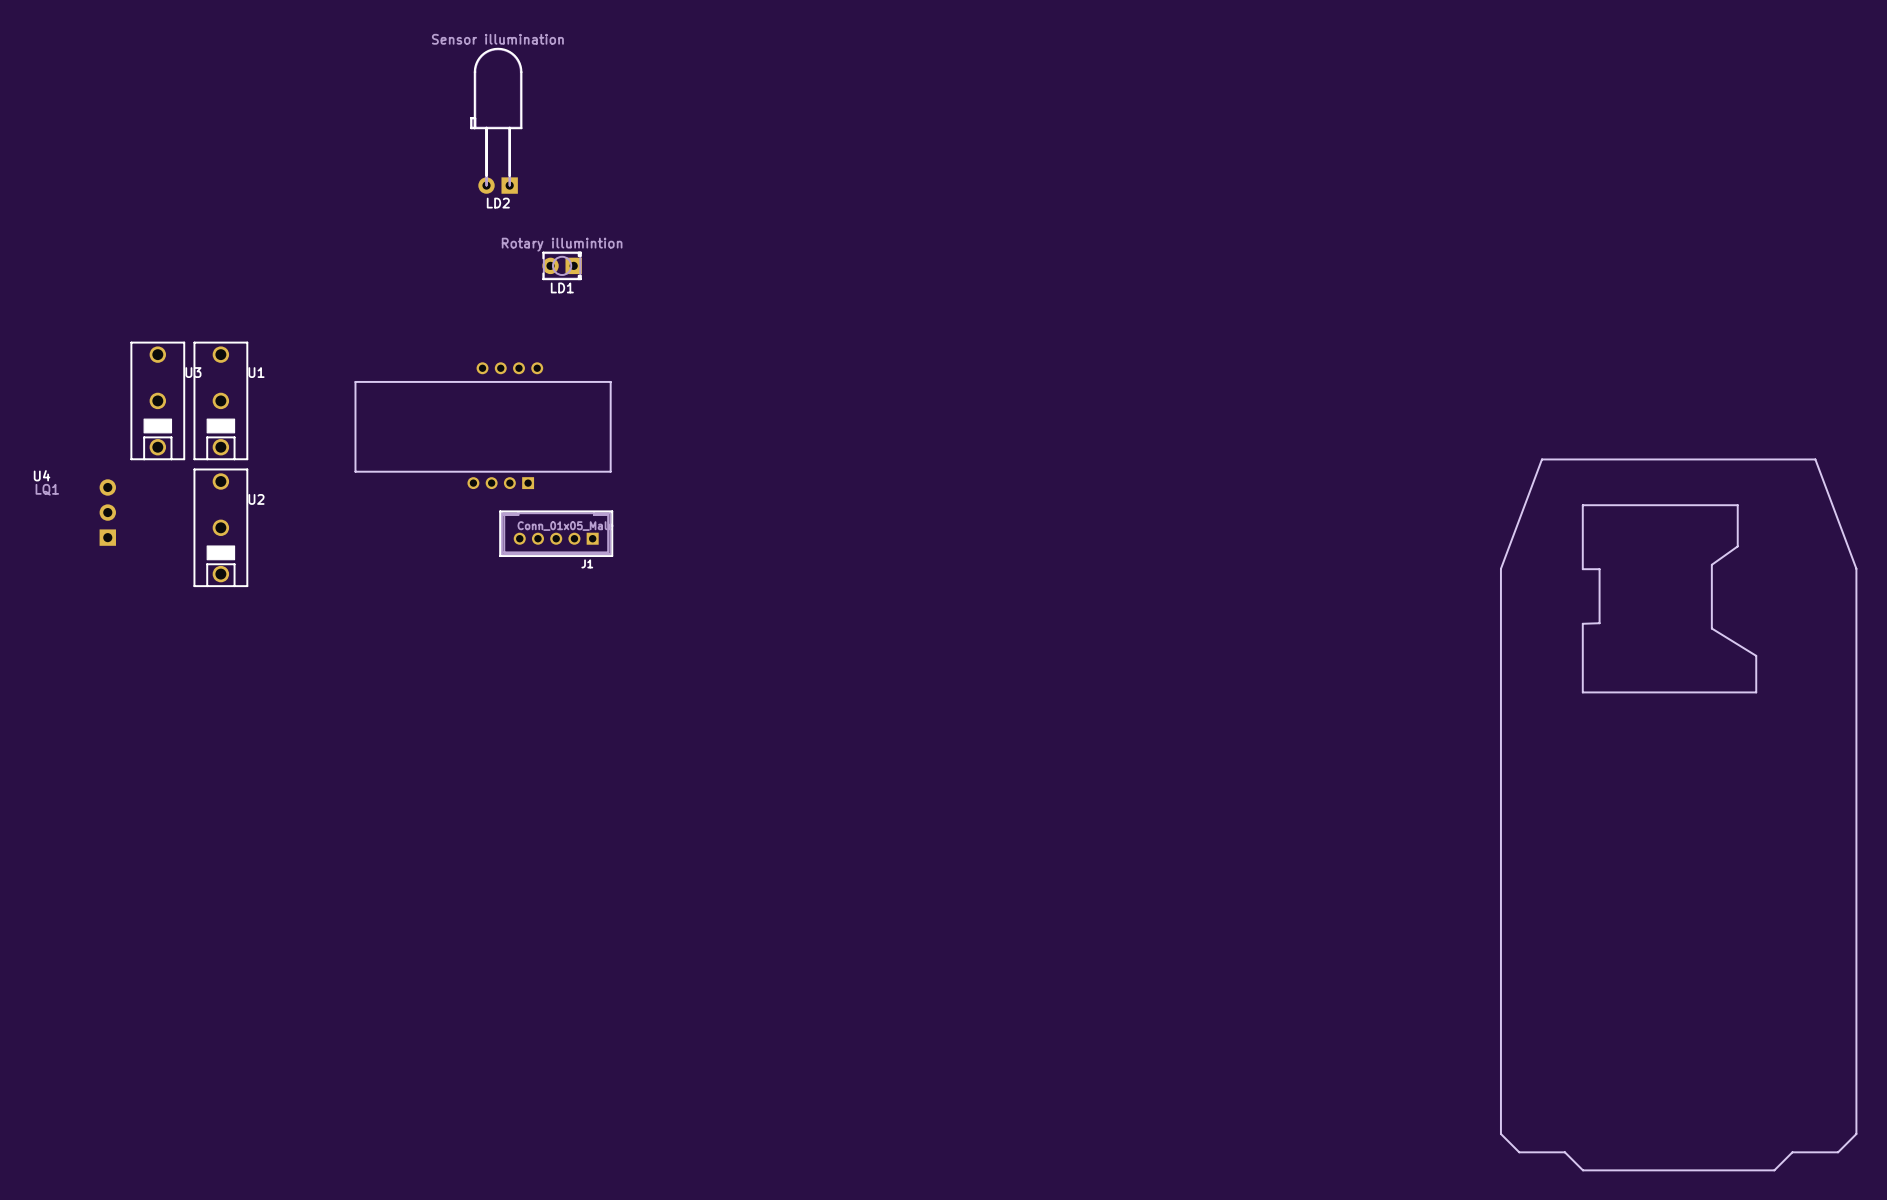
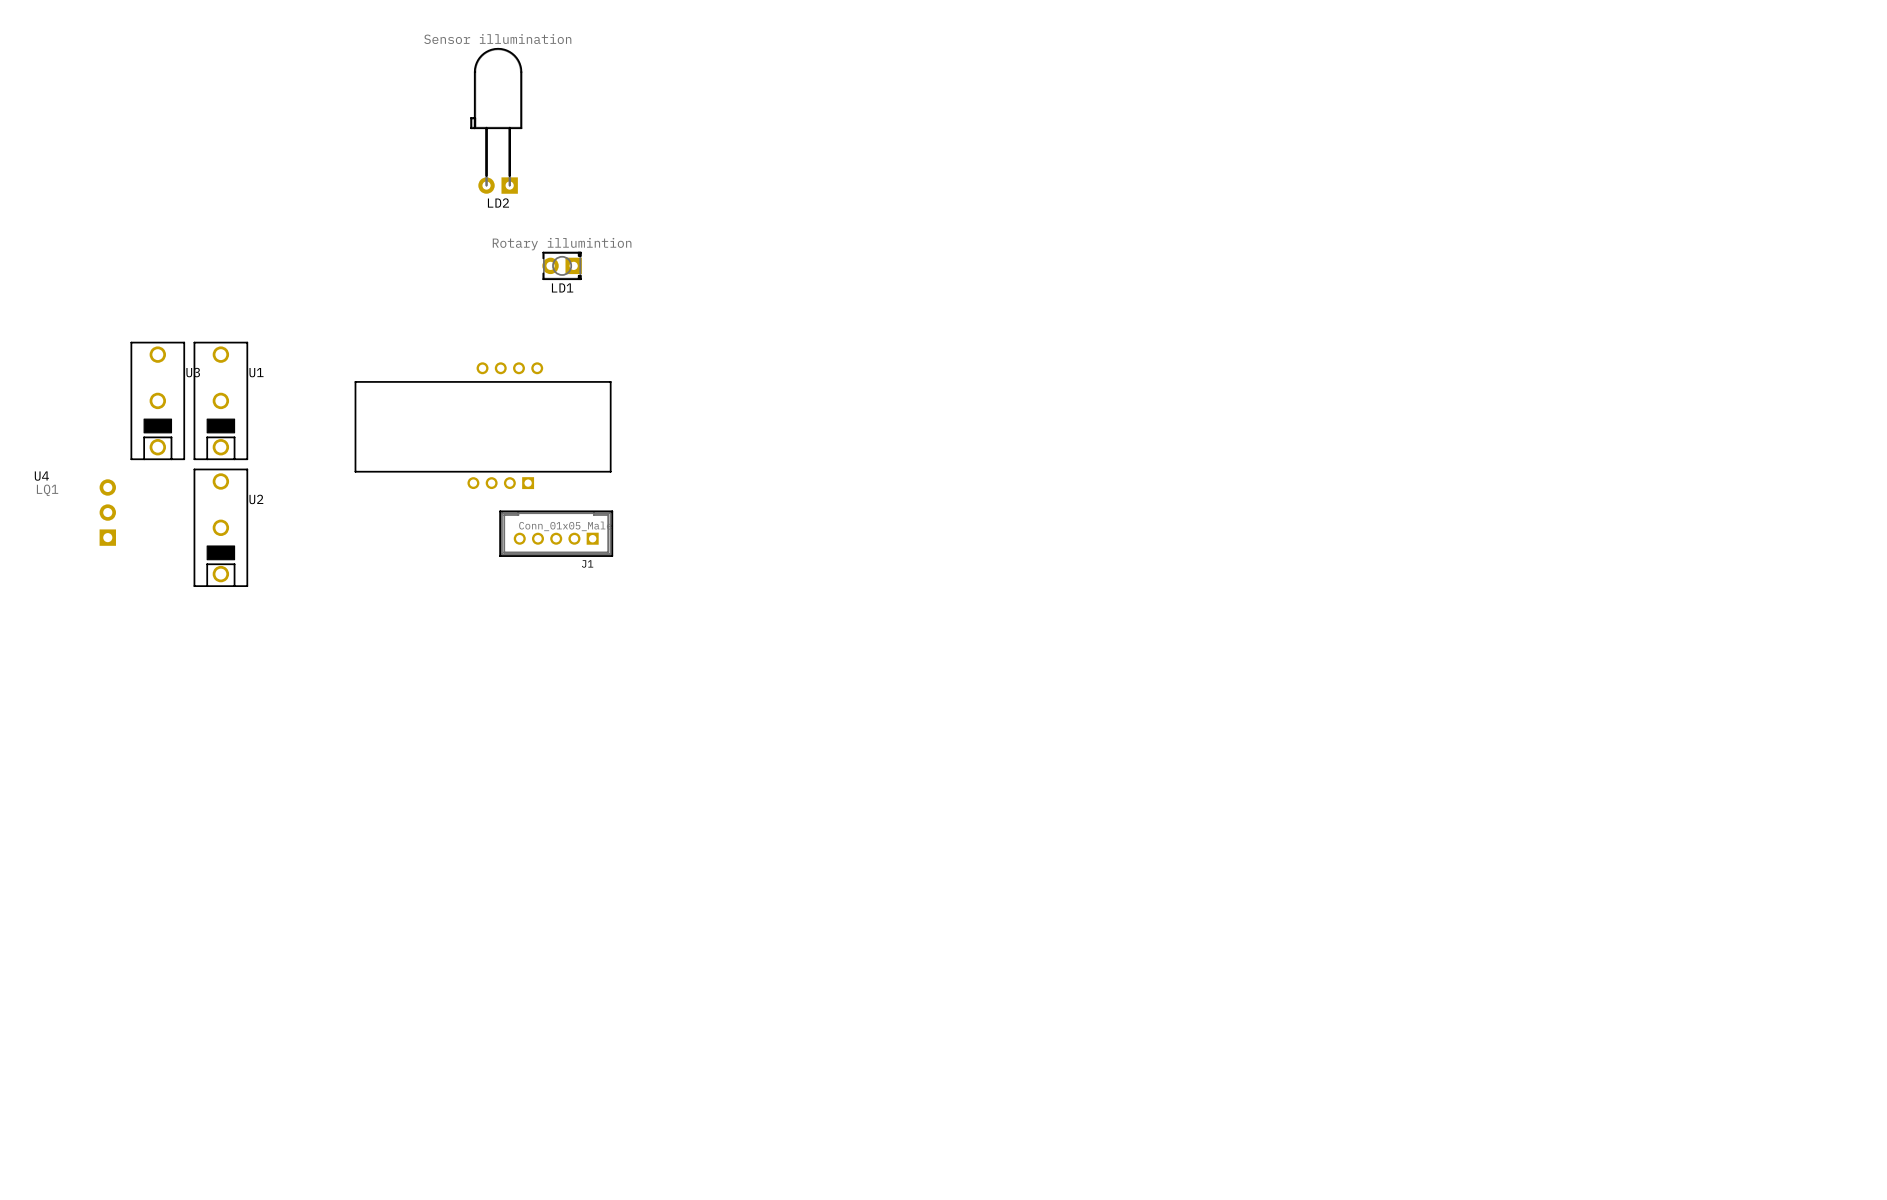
board edge: (1815, 459) (1541, 459) (1500, 568) (1500, 1134) (1519, 1152) (1564, 1152) (1582, 1170) (1774, 1170) (1792, 1152) (1838, 1152) (1856, 1134) (1856, 568) (1815, 459) -> none
board edge: (1737, 505) (1737, 546) (1711, 564) (1711, 628) (1756, 655) (1756, 692) (1582, 692) (1582, 623) (1599, 623) (1599, 569) (1582, 569) (1582, 505) (1737, 505) -> none

